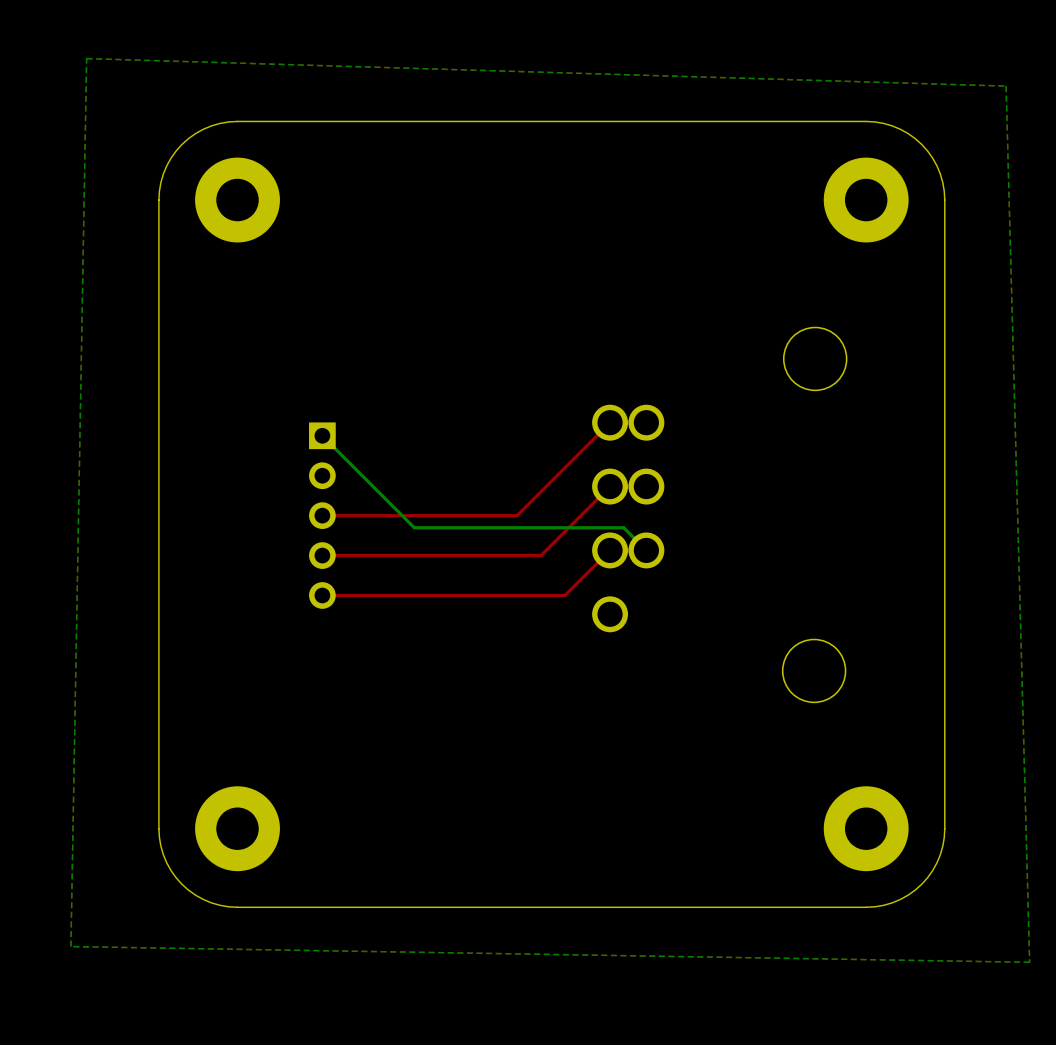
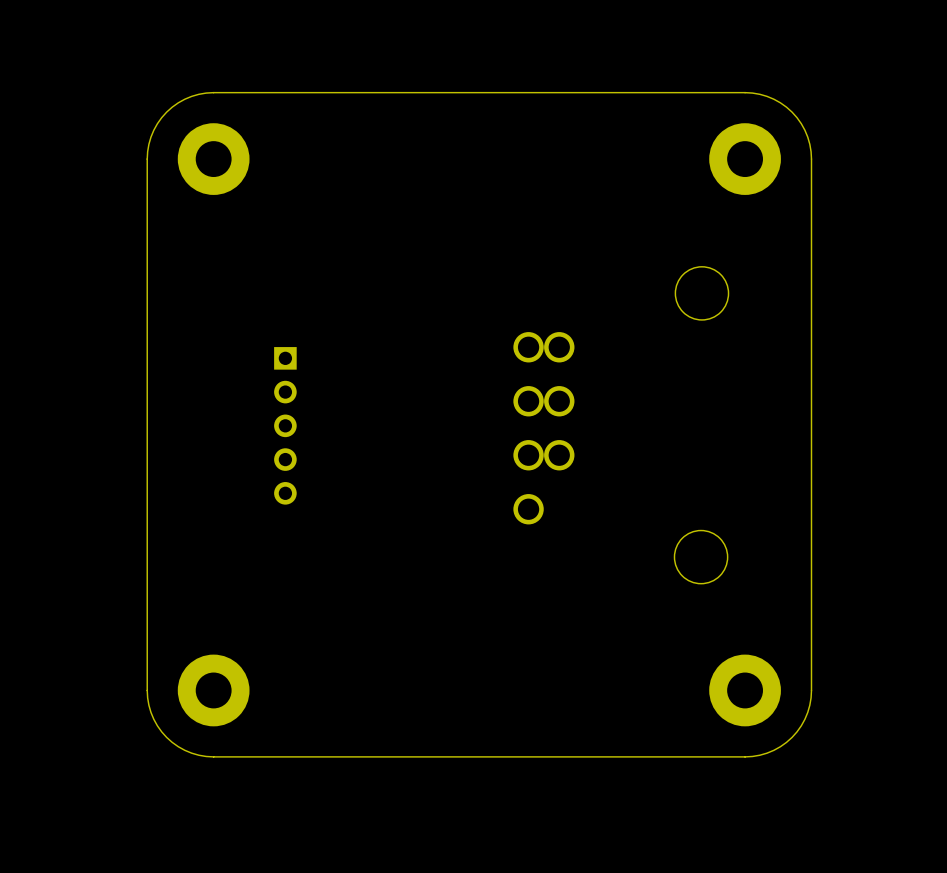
bottom zone outline: (86, 58) (70, 946) (1029, 962) (1006, 86) (86, 58) -> none
top track: (610, 422) (517, 515) (322, 515) -> none
bottom track: (322, 435) (414, 527) (623, 527) (646, 550) -> none
top track: (610, 486) (541, 555) (322, 555) -> none
top track: (610, 550) (565, 595) (322, 595) -> none

